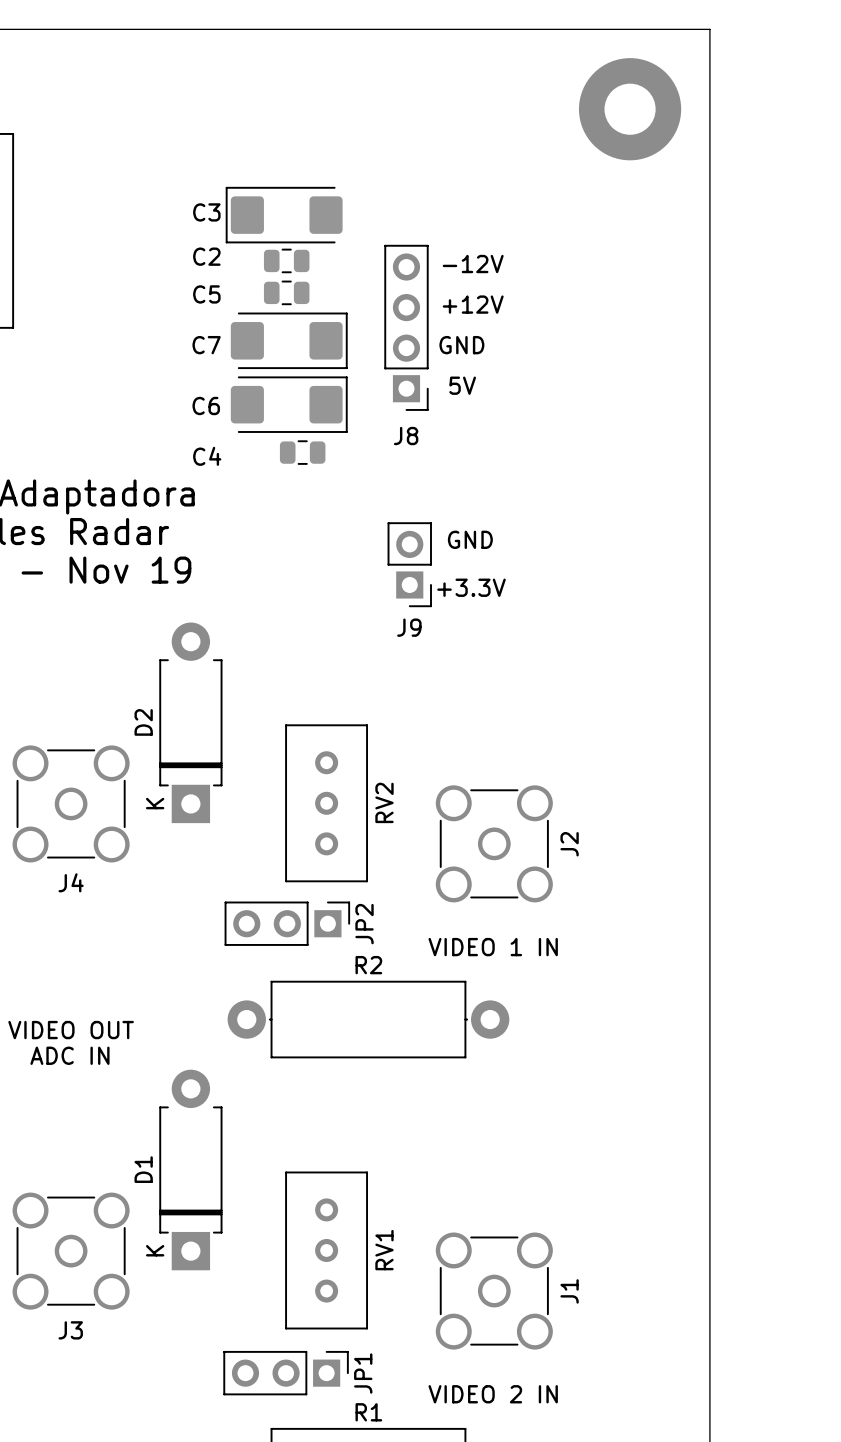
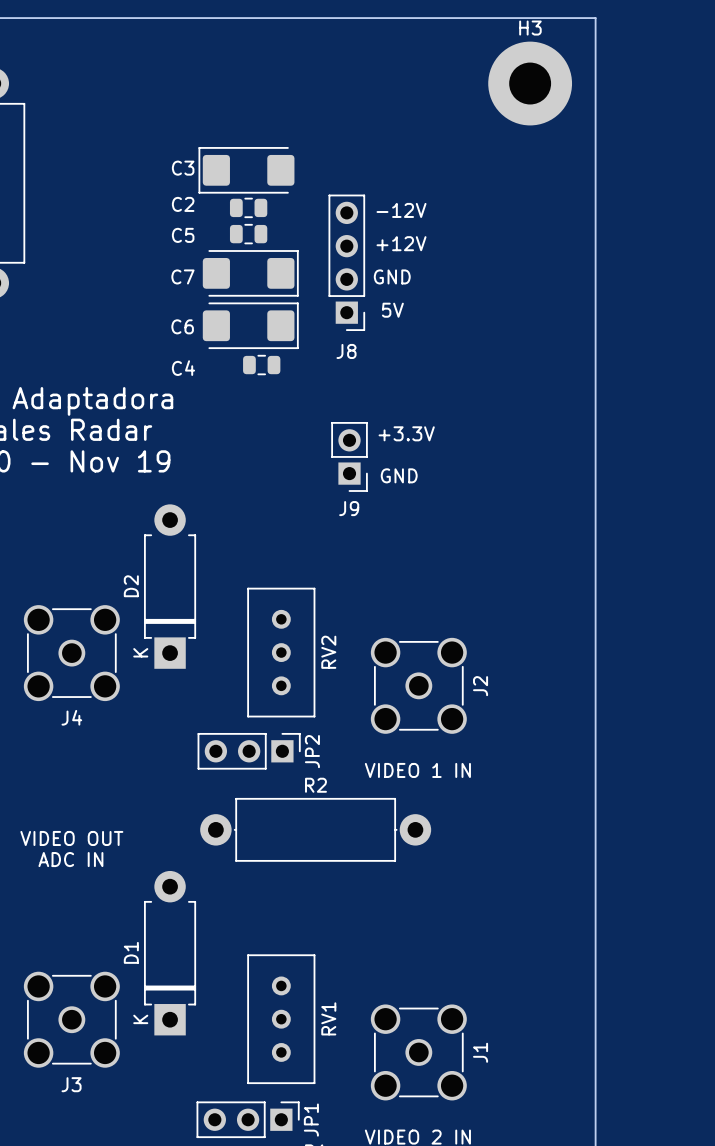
H3 name: none -> H3 (530, 28)
text: GND (470, 539) -> +3.3V (406, 433)
text: +3.3V (471, 587) -> GND (399, 475)

